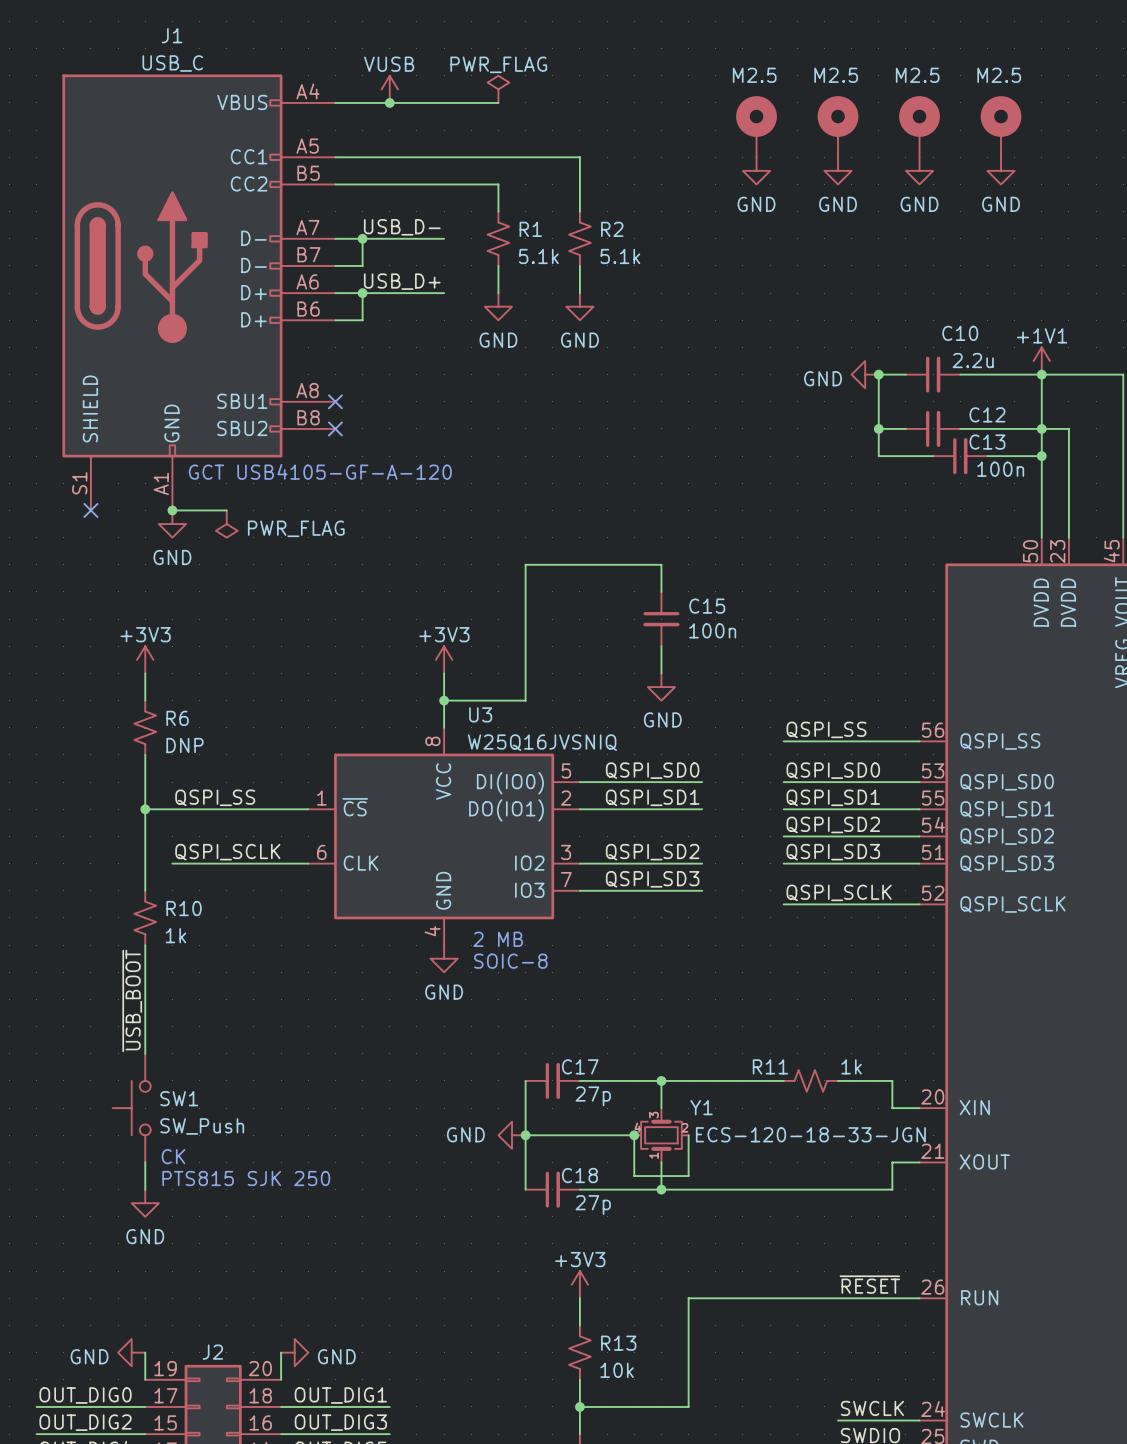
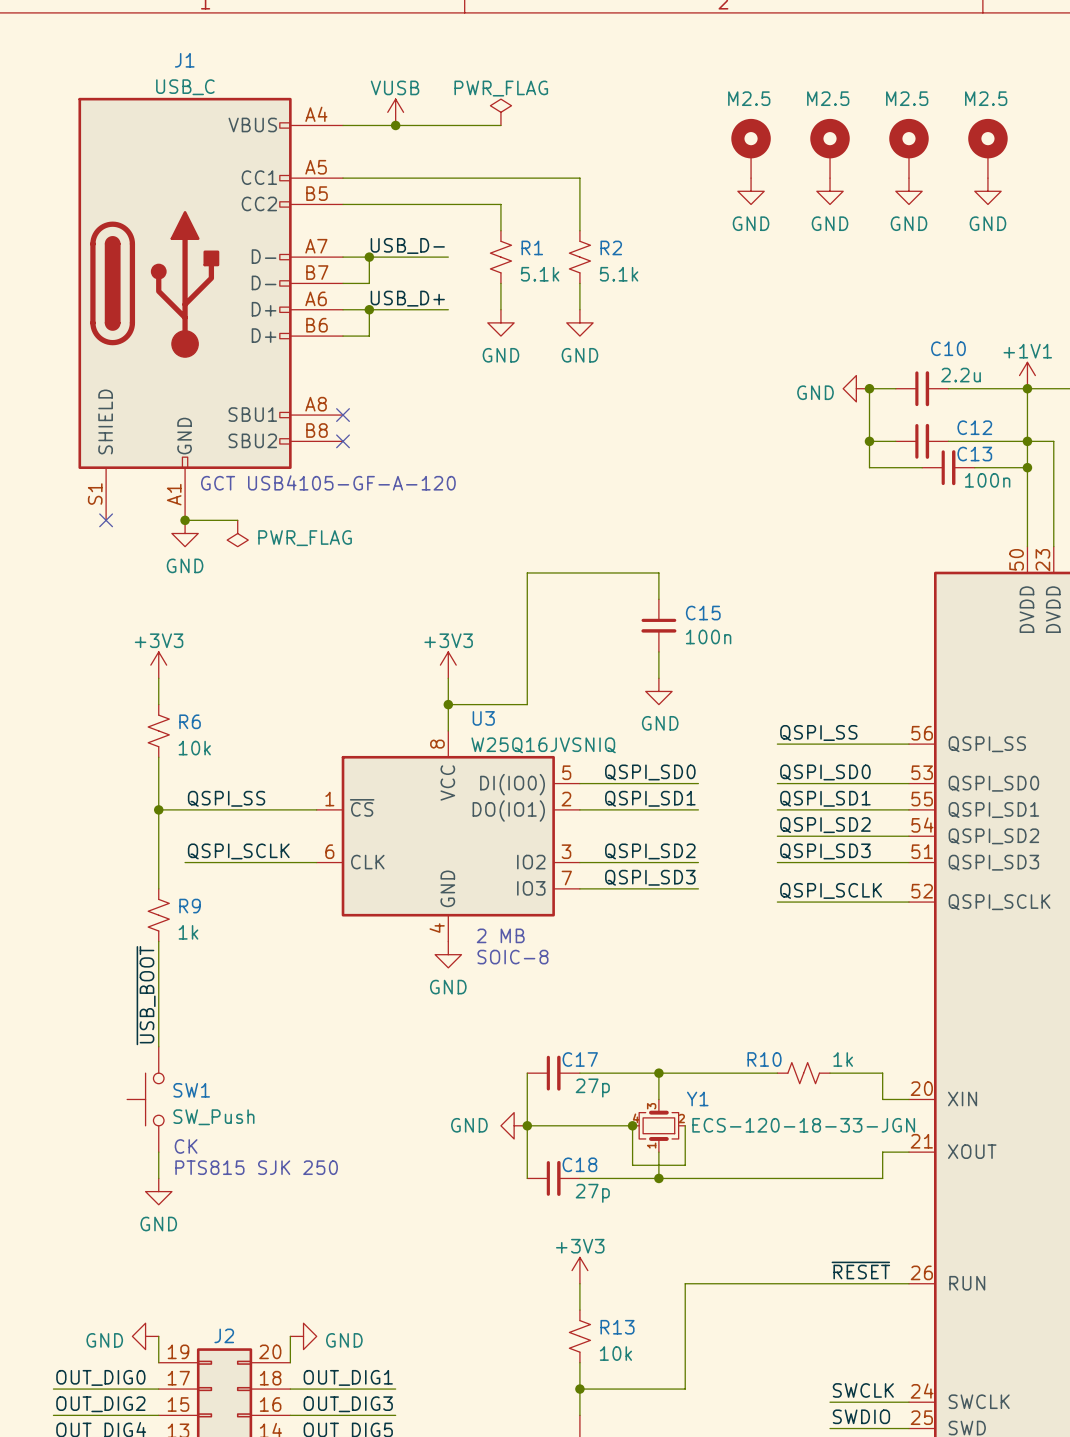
R6 value: DNP (185, 745) -> 10k (194, 748)
R10 name: R10 (184, 908) -> R9 (190, 906)
R11 name: R11 (770, 1066) -> R10 (764, 1059)

